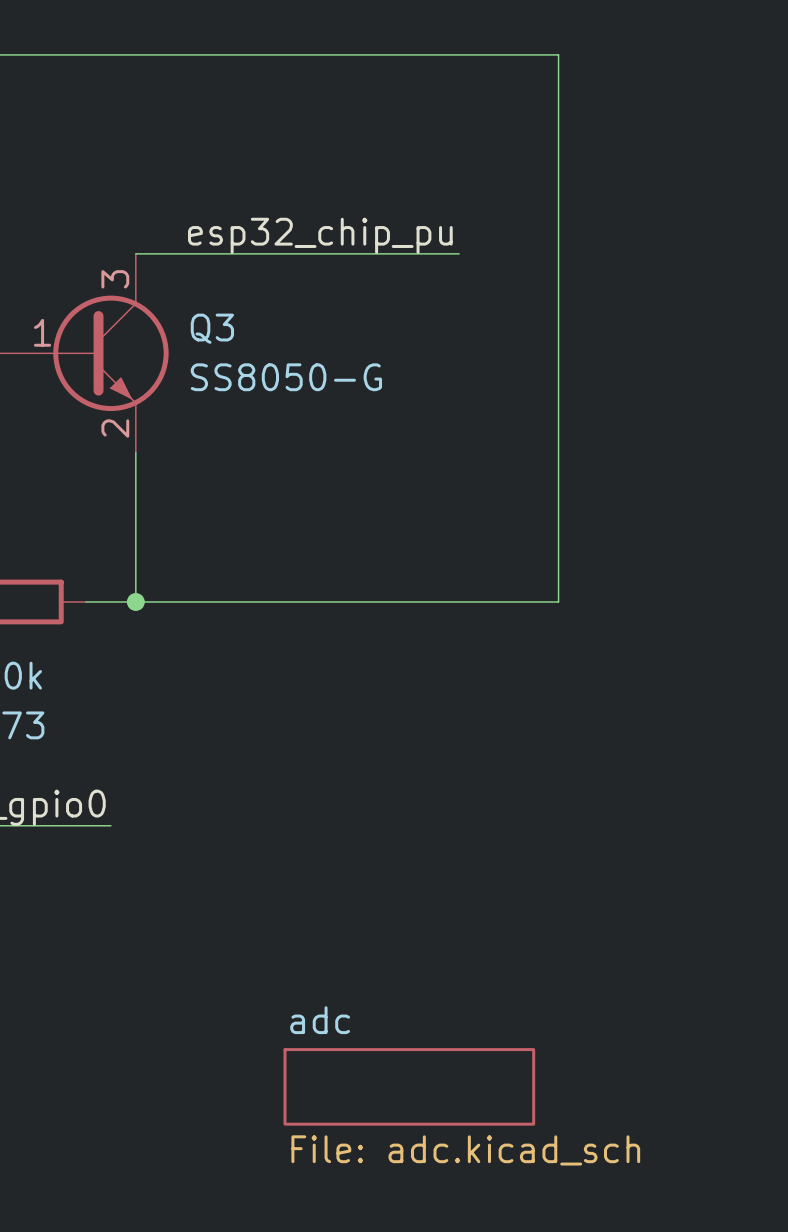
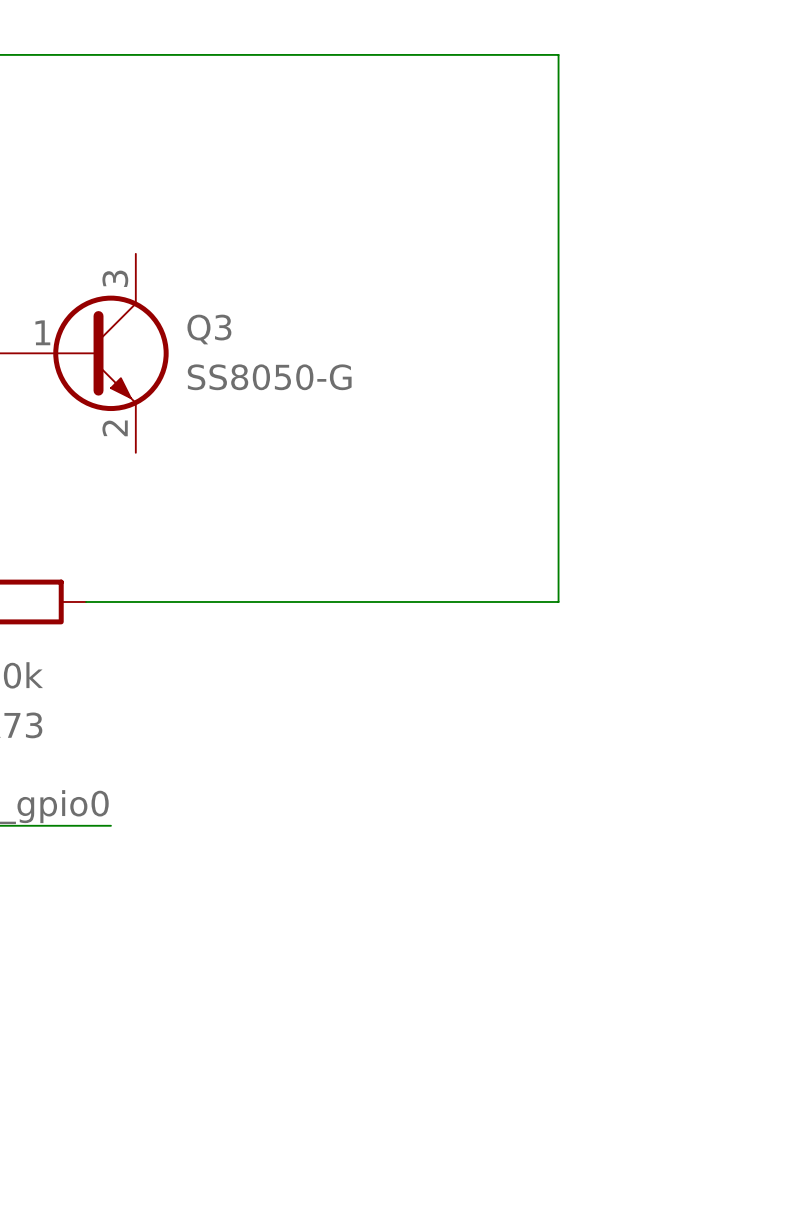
label: esp32_chip_pu (320, 235) -> none
wire: (135, 253) (459, 253) -> none
wire: (135, 452) (135, 601) -> none
junction: (135, 601) -> none
sheet adc: File: adc.kicad_sch (409, 1086) -> none

